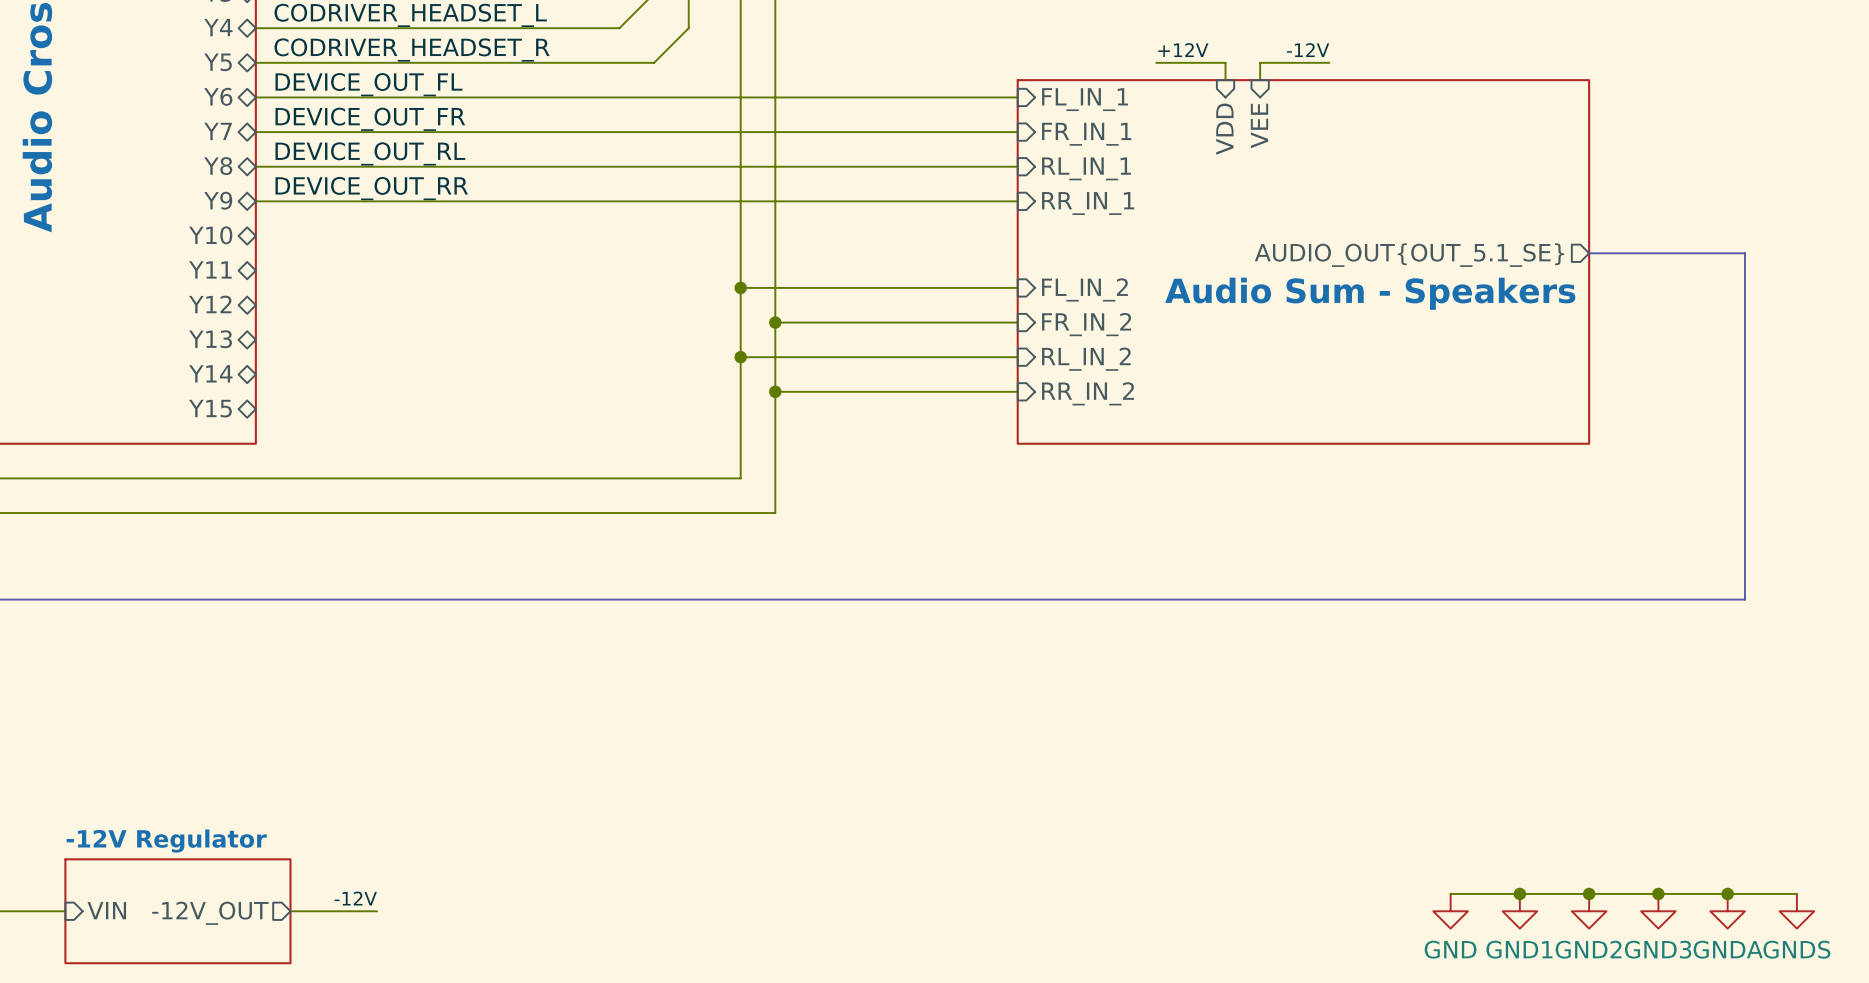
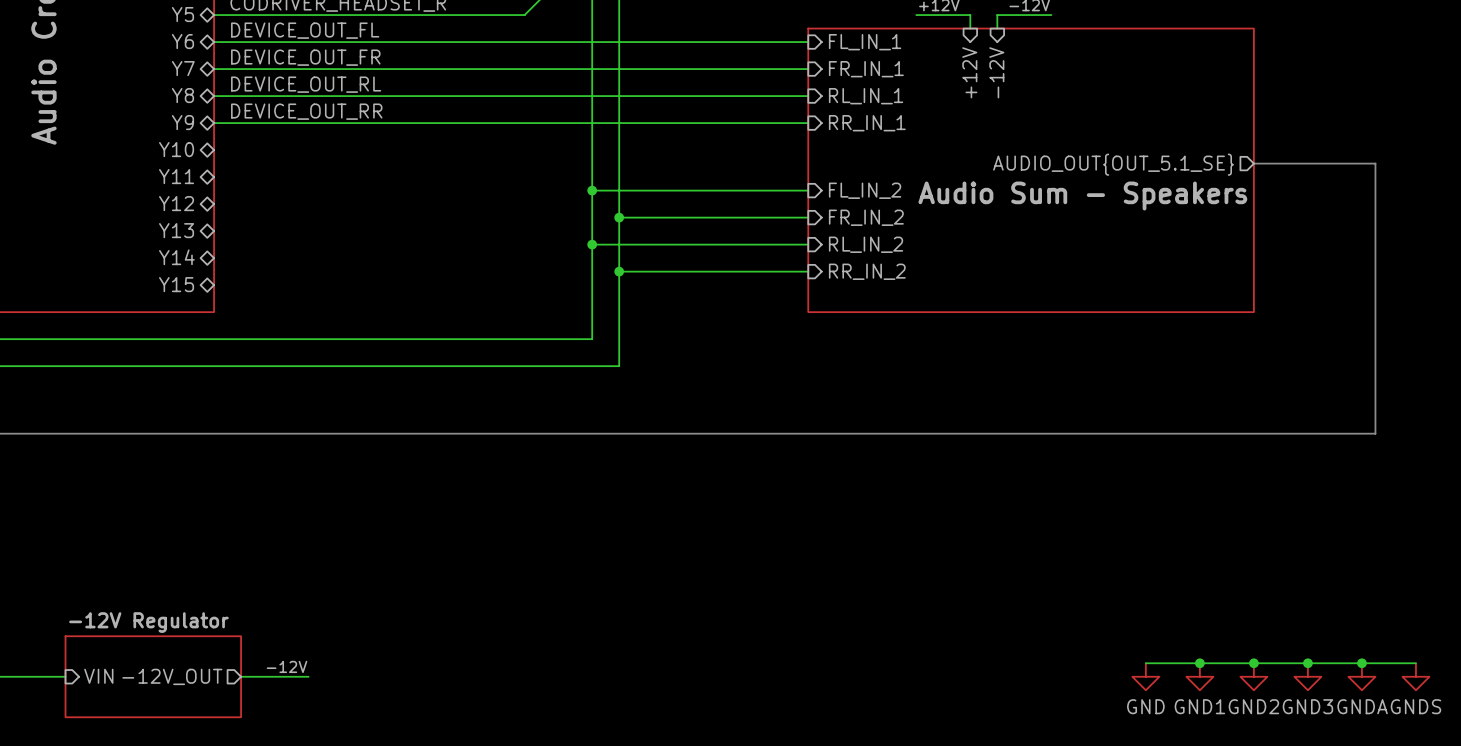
sheet pin: VEE (1259, 125) -> -12V (996, 72)
sheet pin: VDD (1224, 129) -> +12V (969, 72)

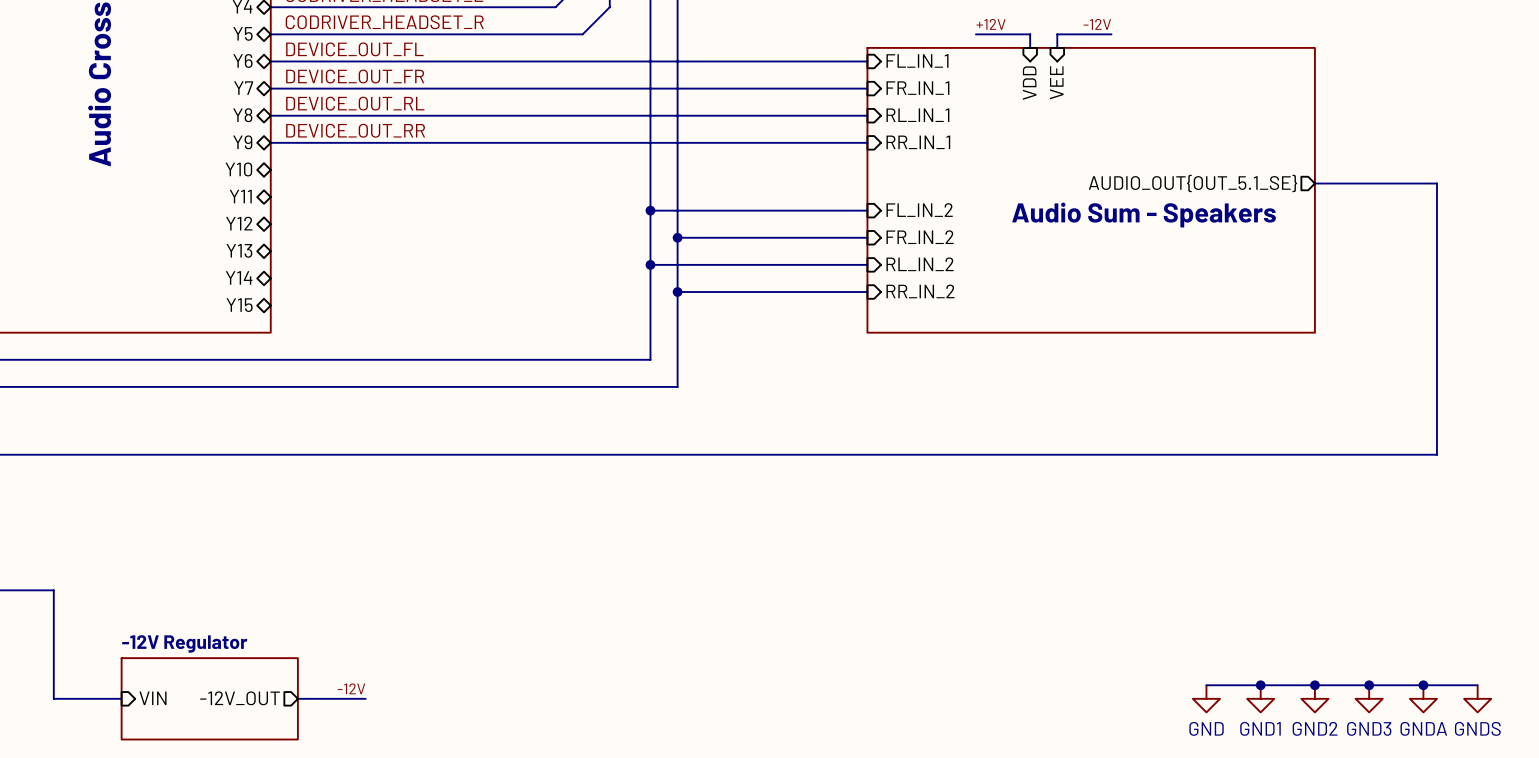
sheet pin: +12V (969, 72) -> VDD (1029, 83)
sheet pin: -12V (996, 72) -> VEE (1056, 82)

